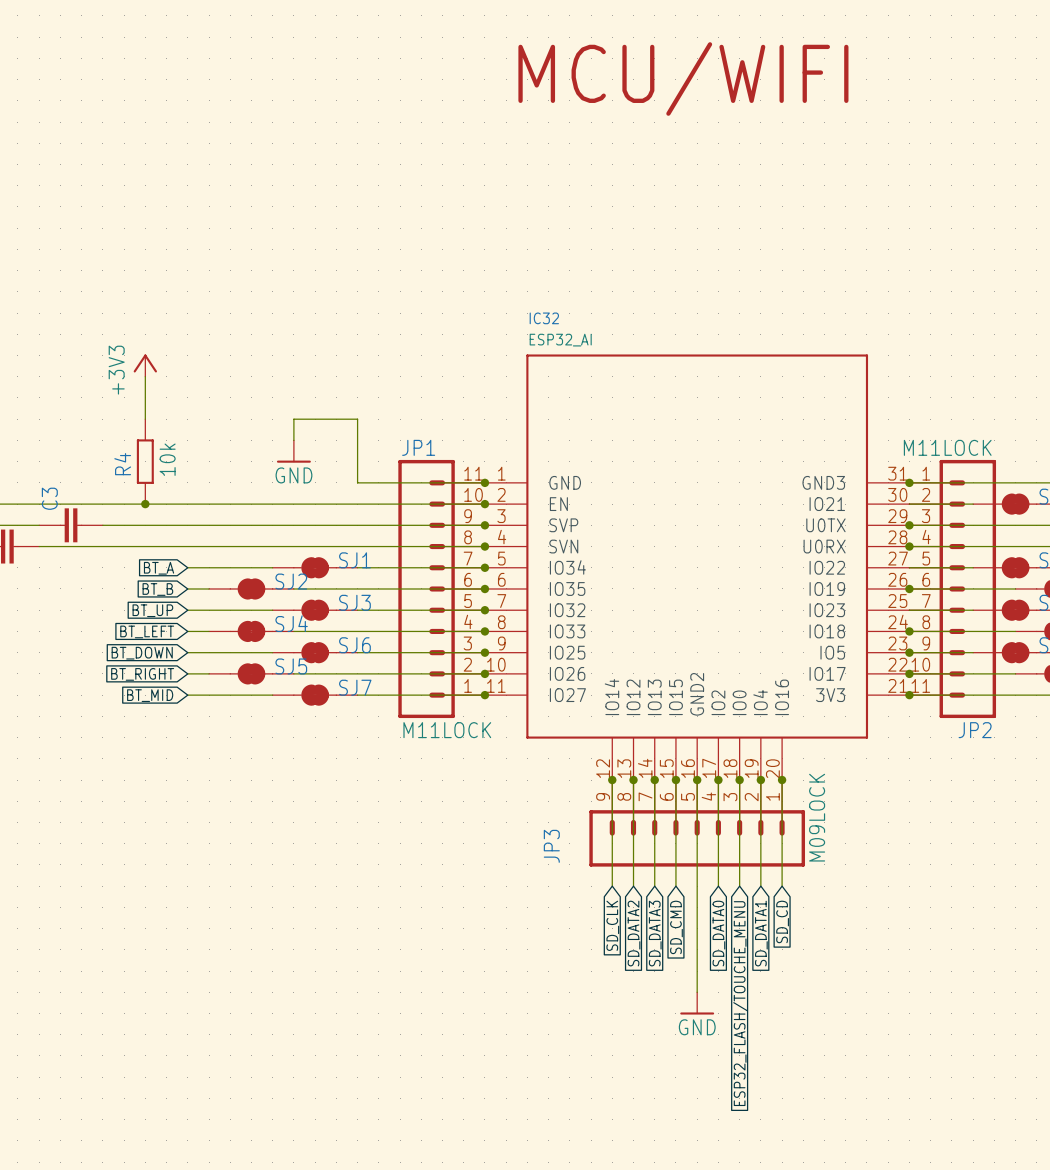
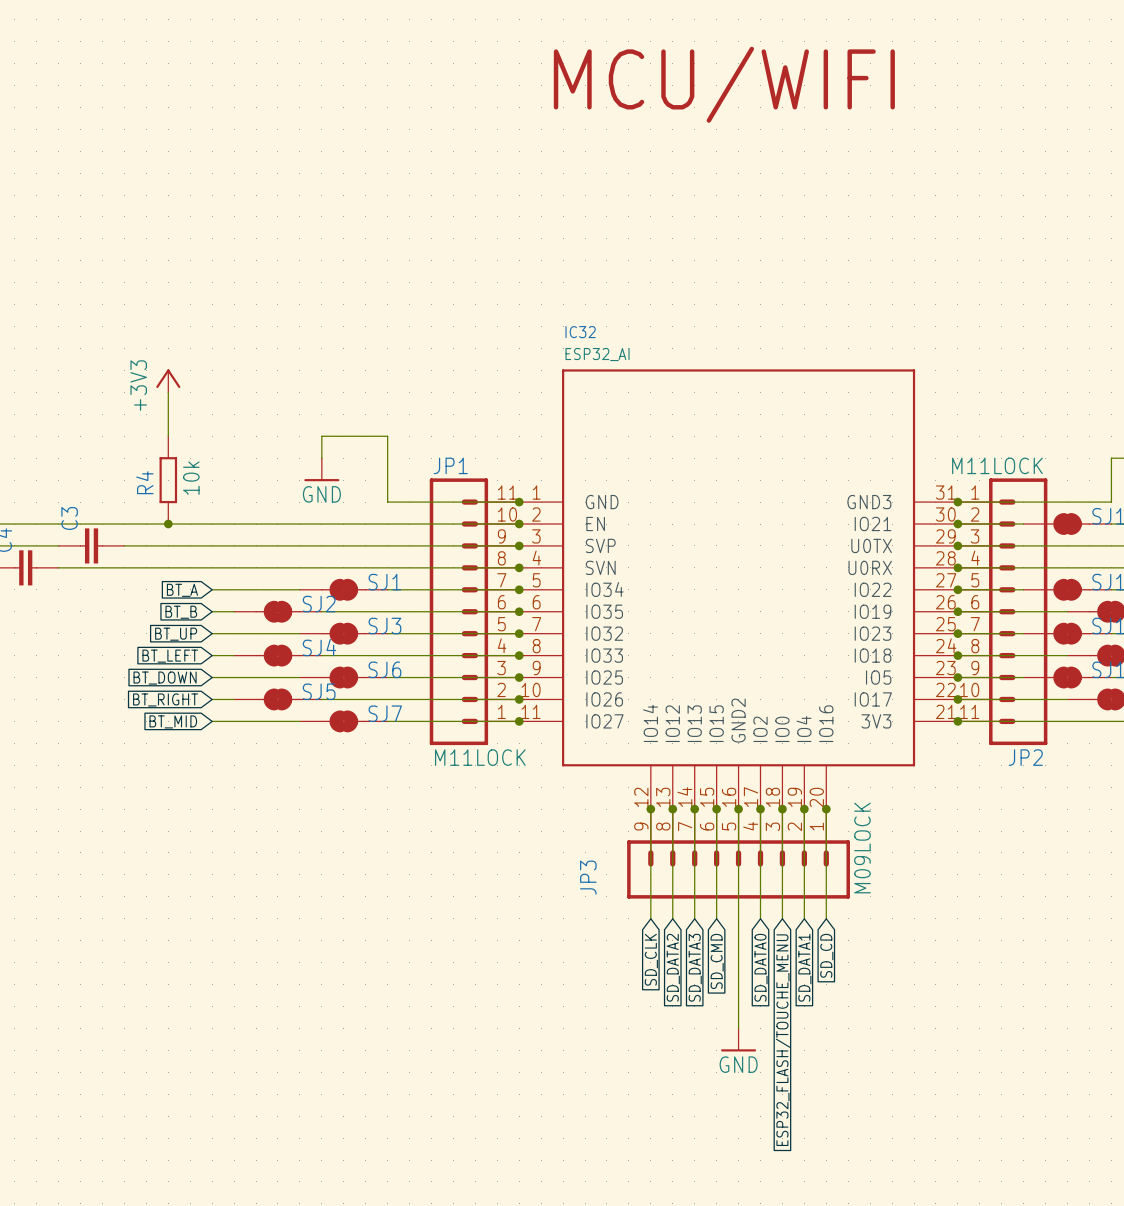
junction: none -> (957, 524)
junction: none -> (957, 589)
junction: none -> (957, 633)

